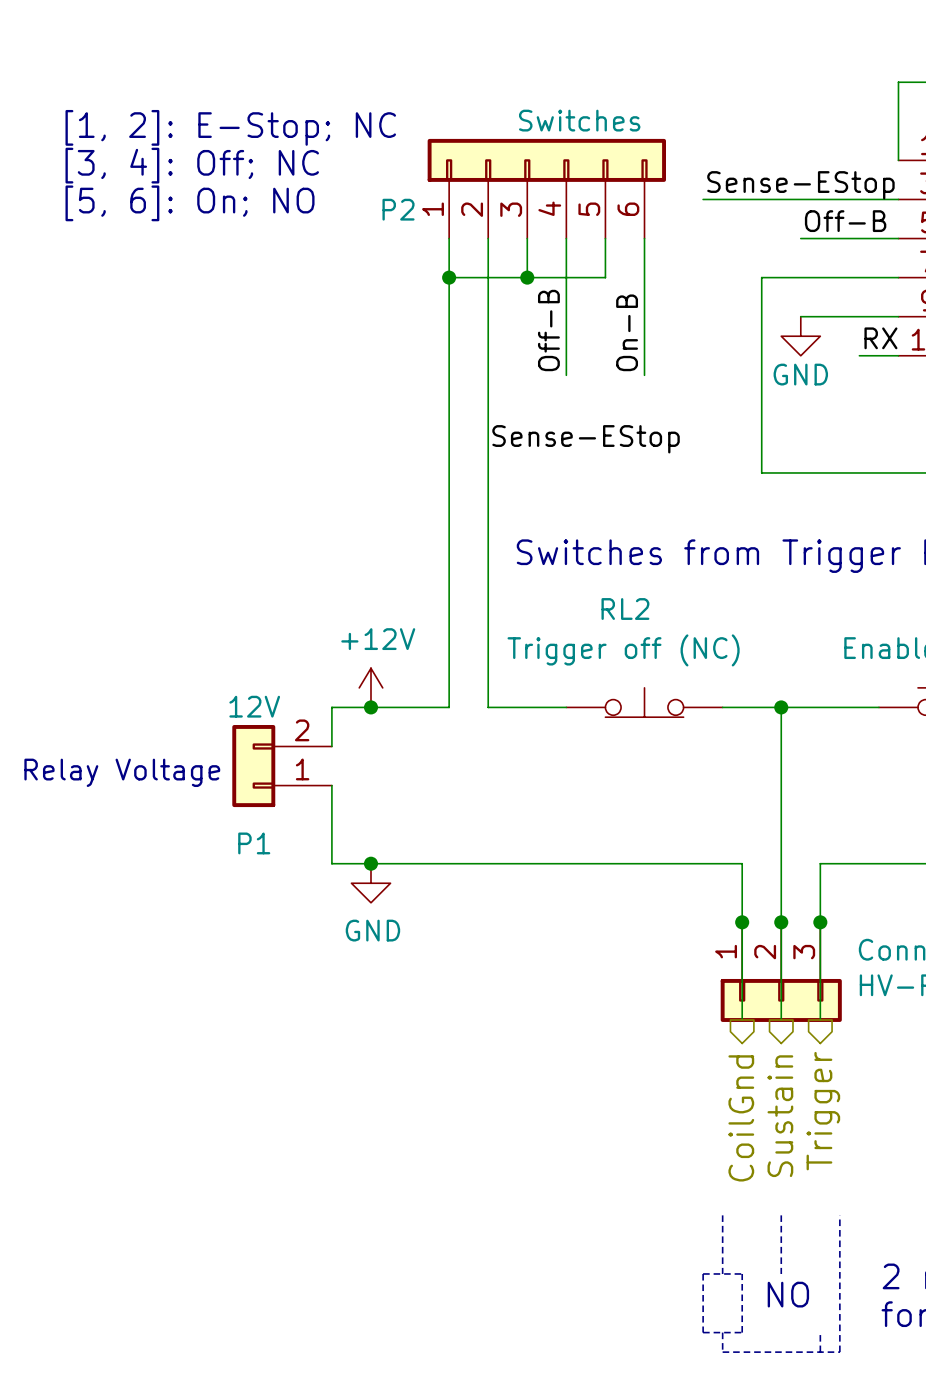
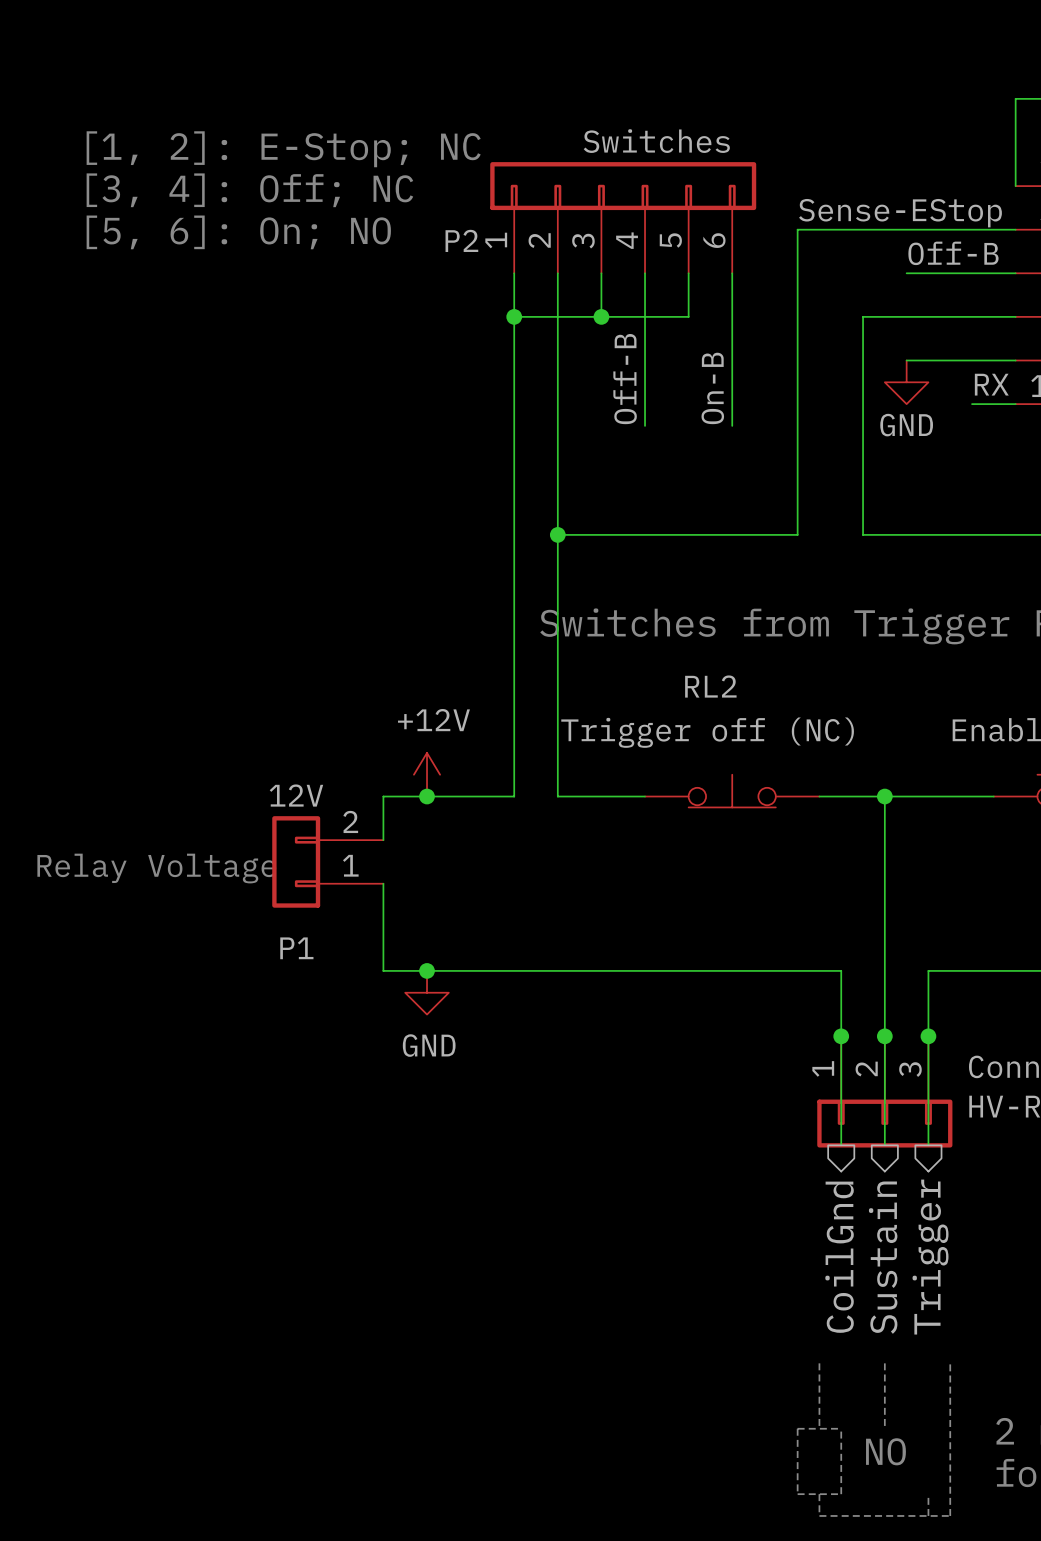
wire: none -> (797, 229) (797, 534) (557, 534)
label: Sense-EStop (586, 439) -> none
junction: none -> (557, 534)

